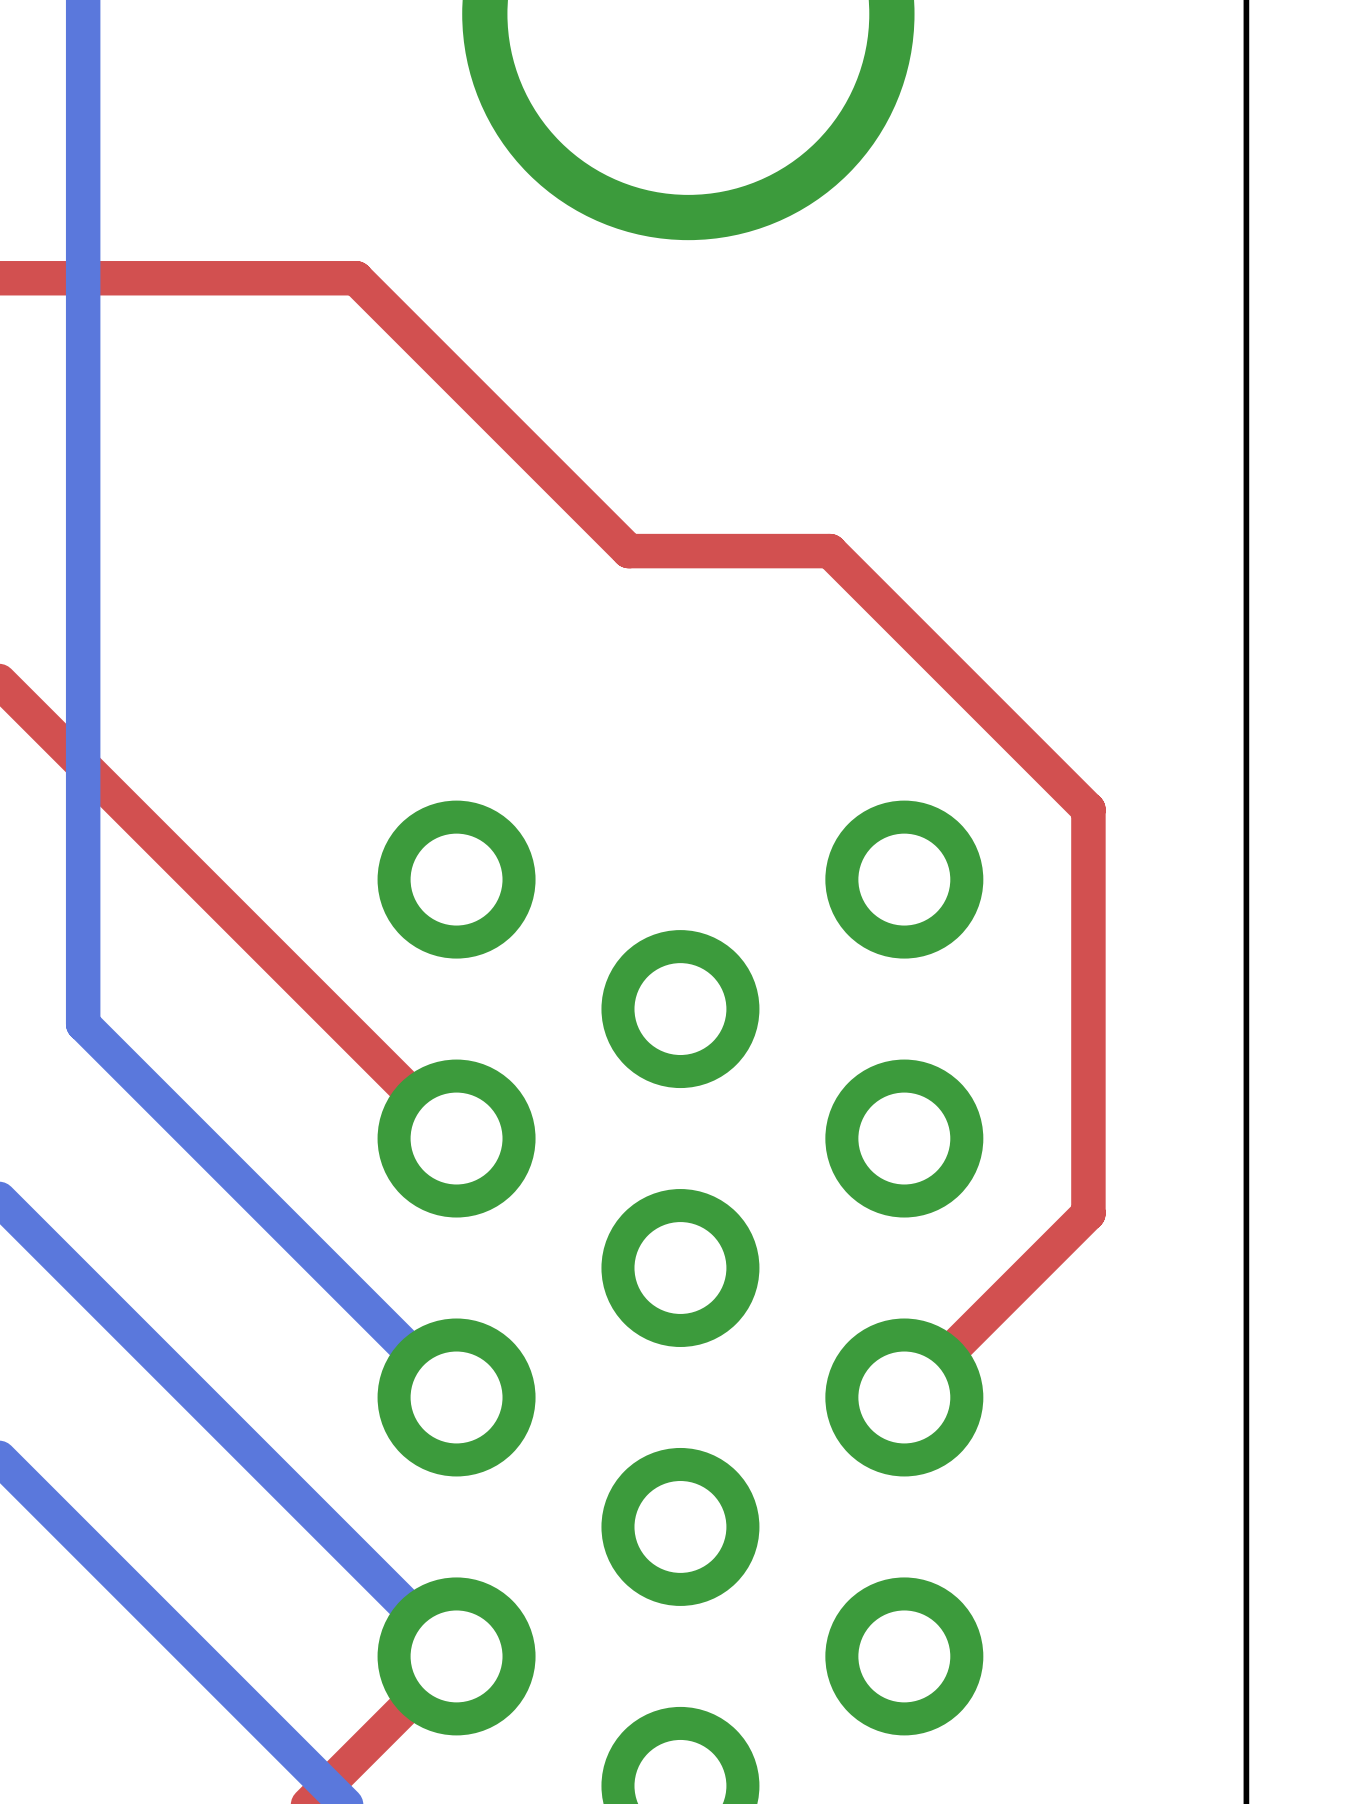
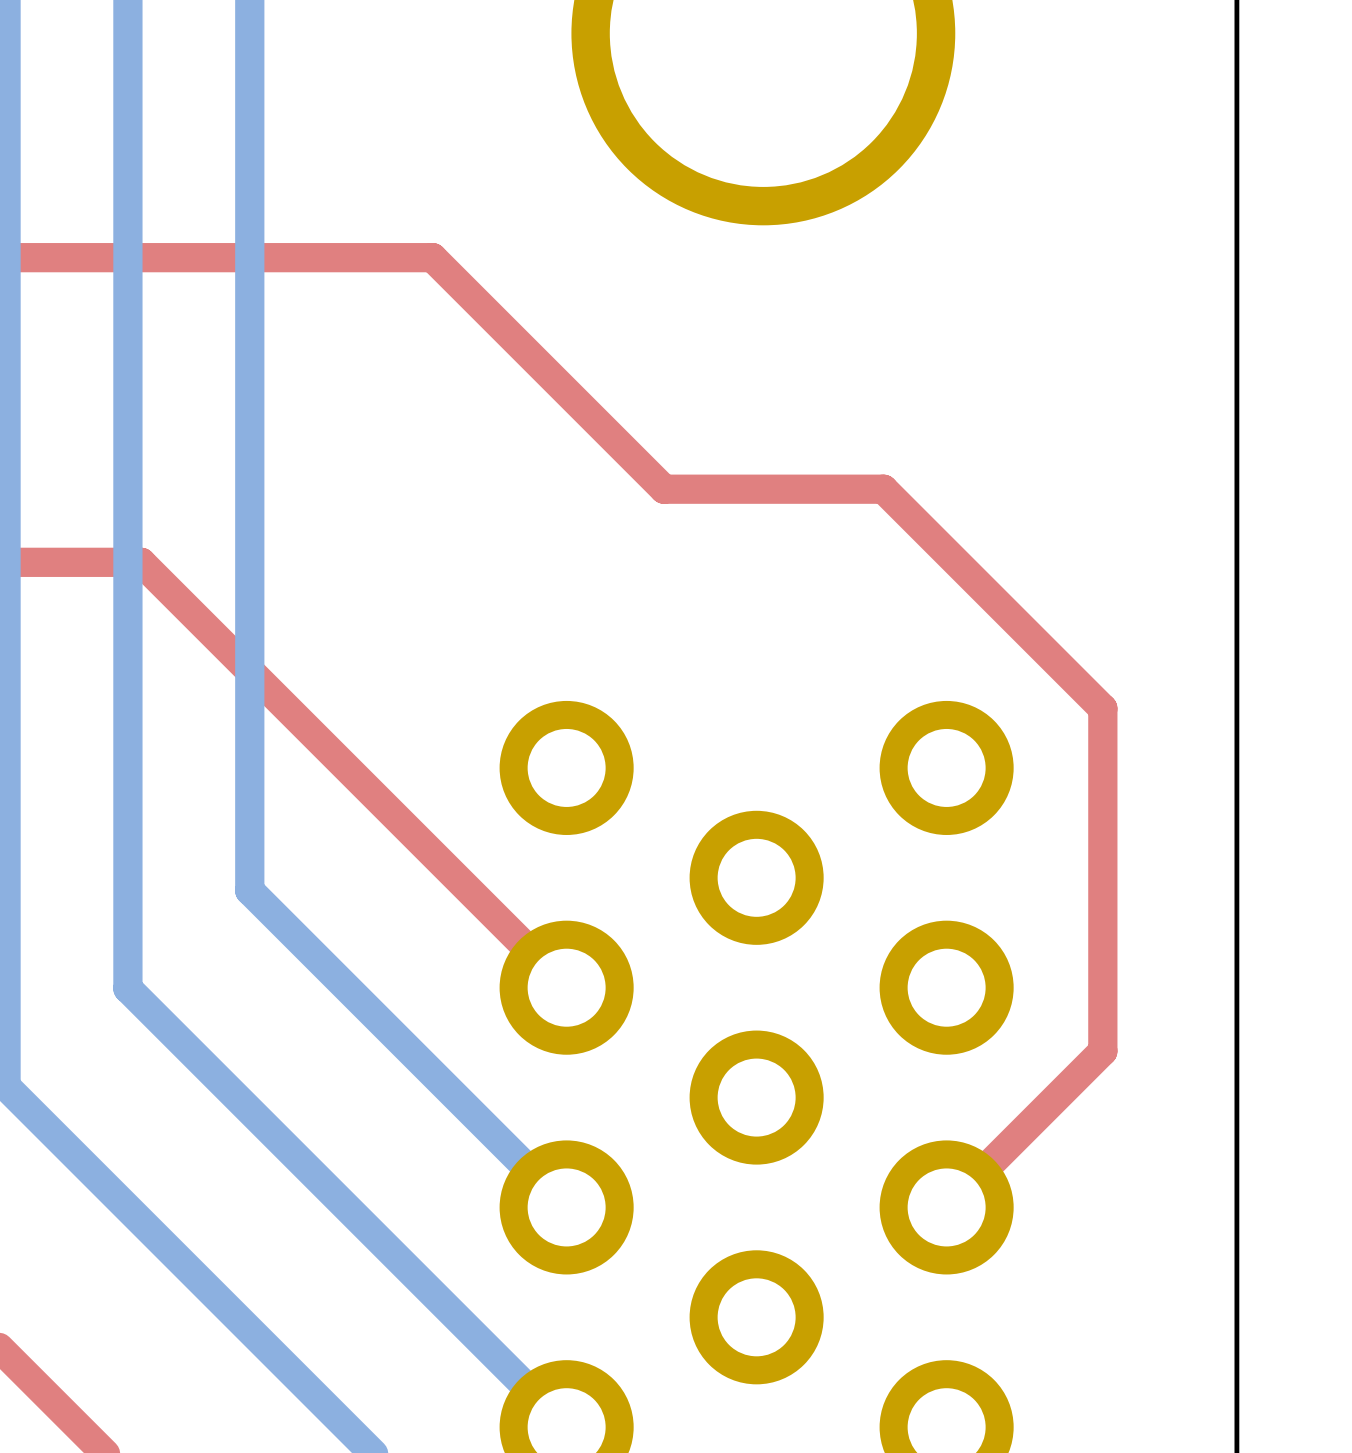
top track: (298, 278) (356, 278) (628, 551) -> (432, 257) (664, 489) (712, 489)

